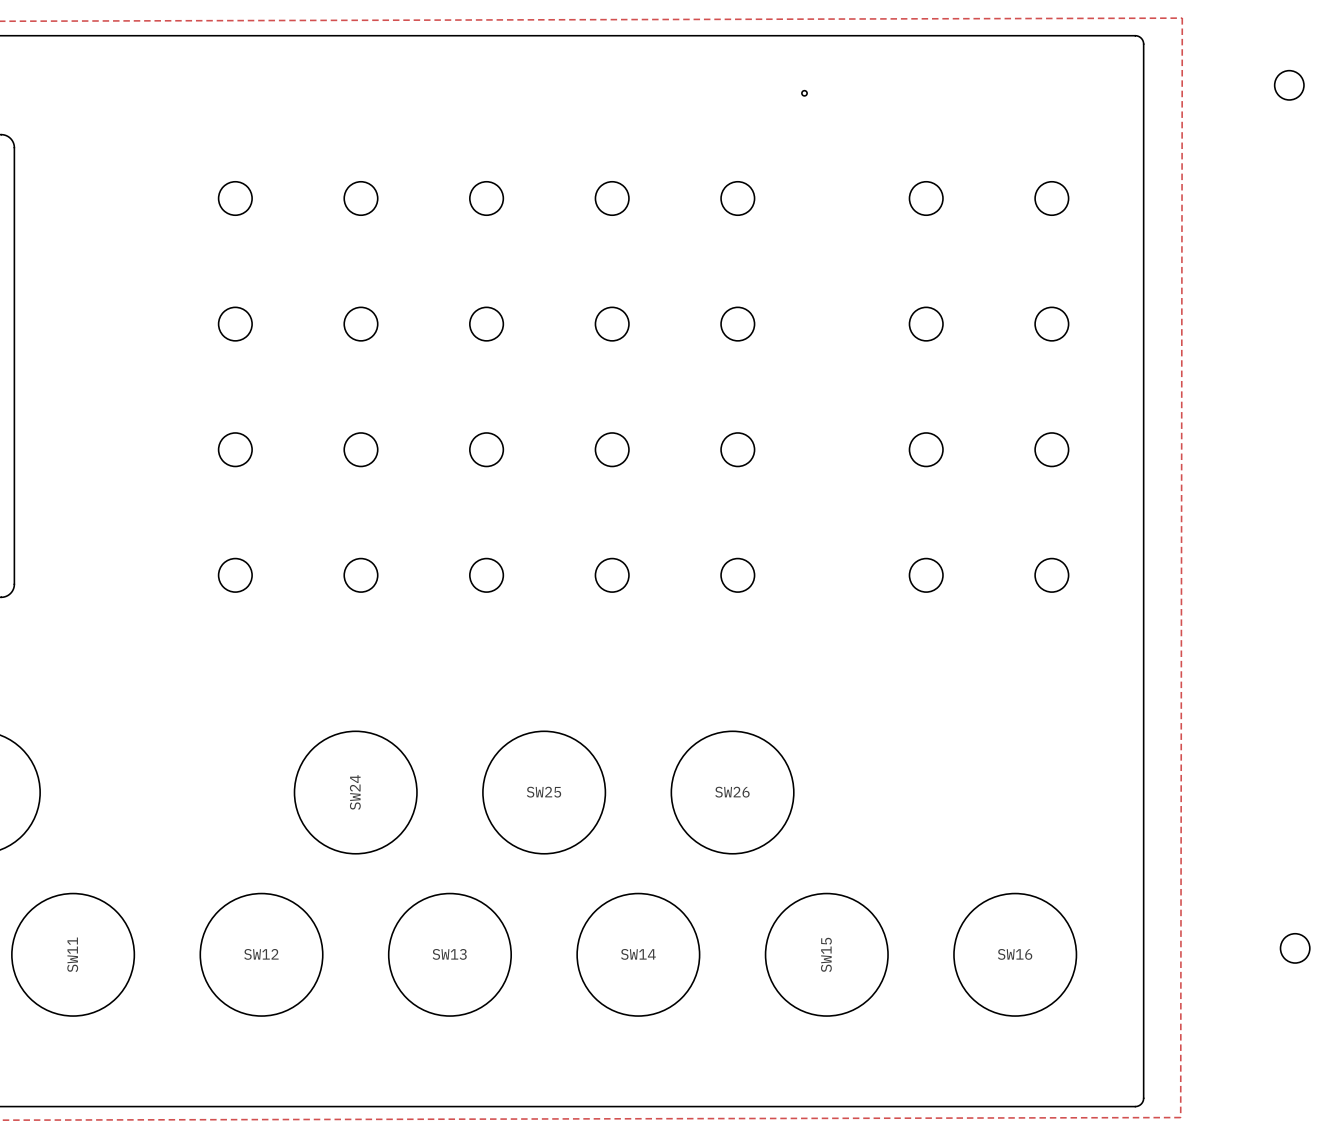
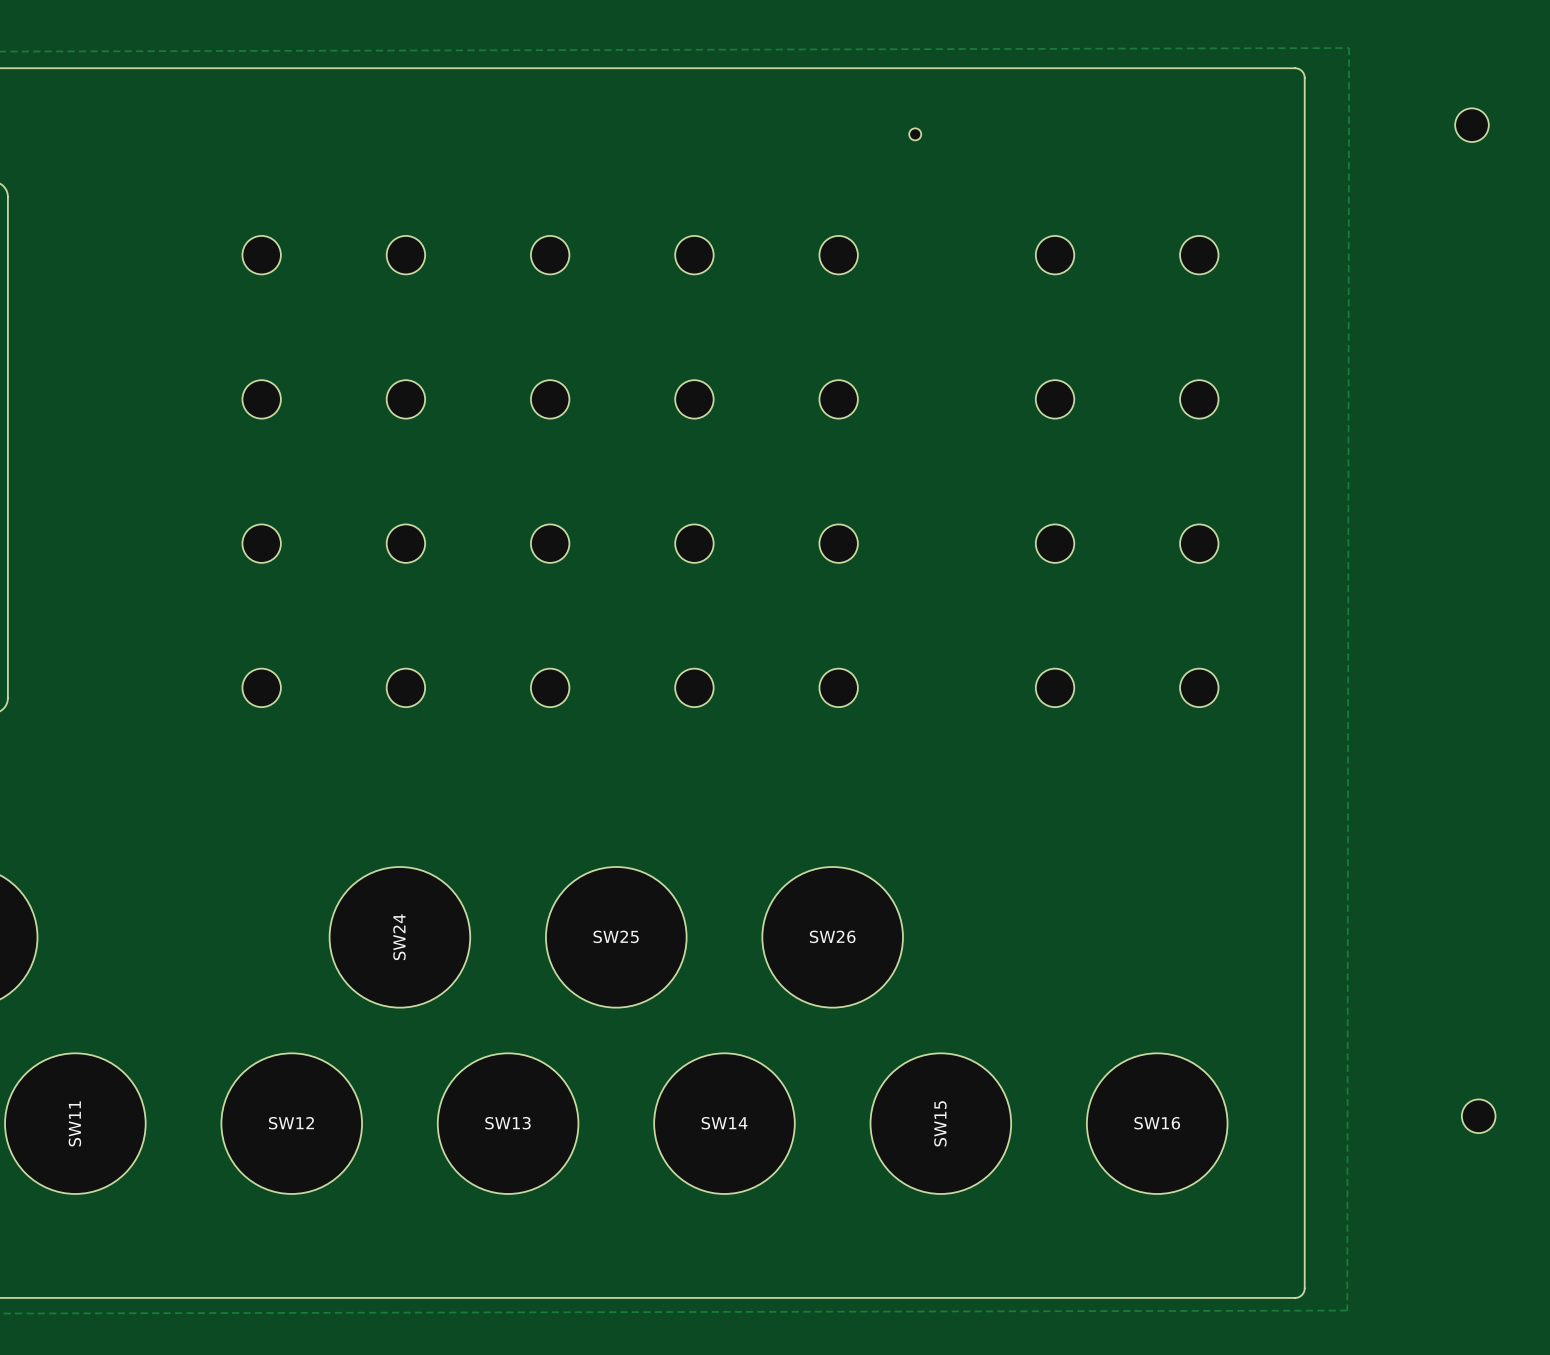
round board edge: [801, 89, 808, 97] -> none
part: none -> (915, 134)

